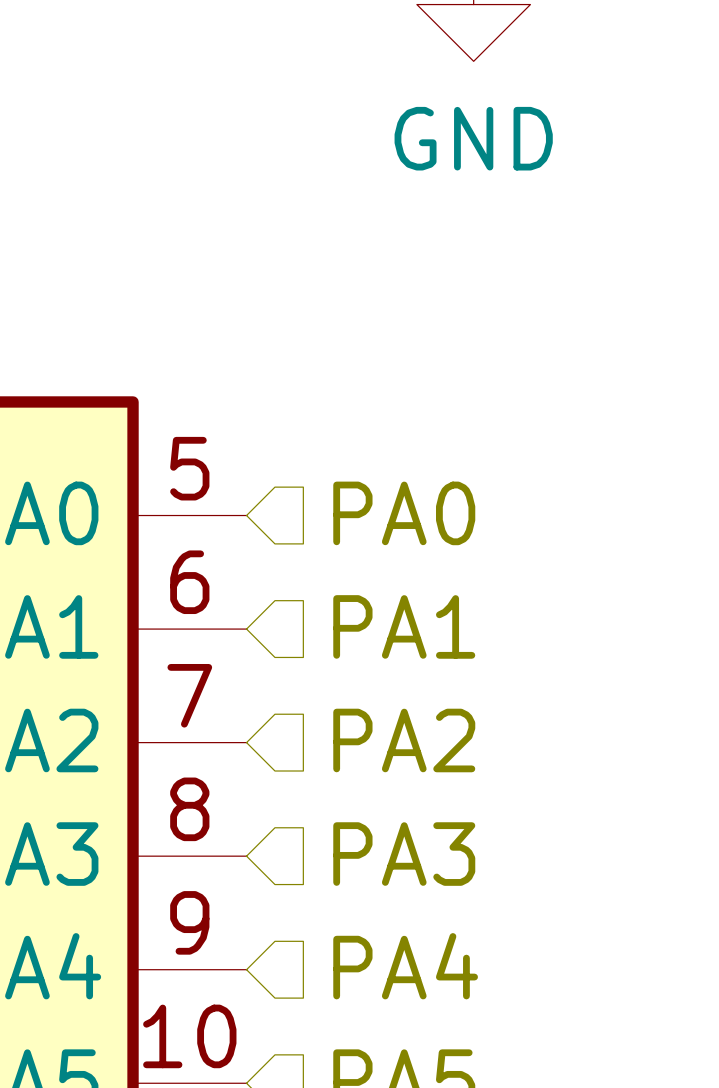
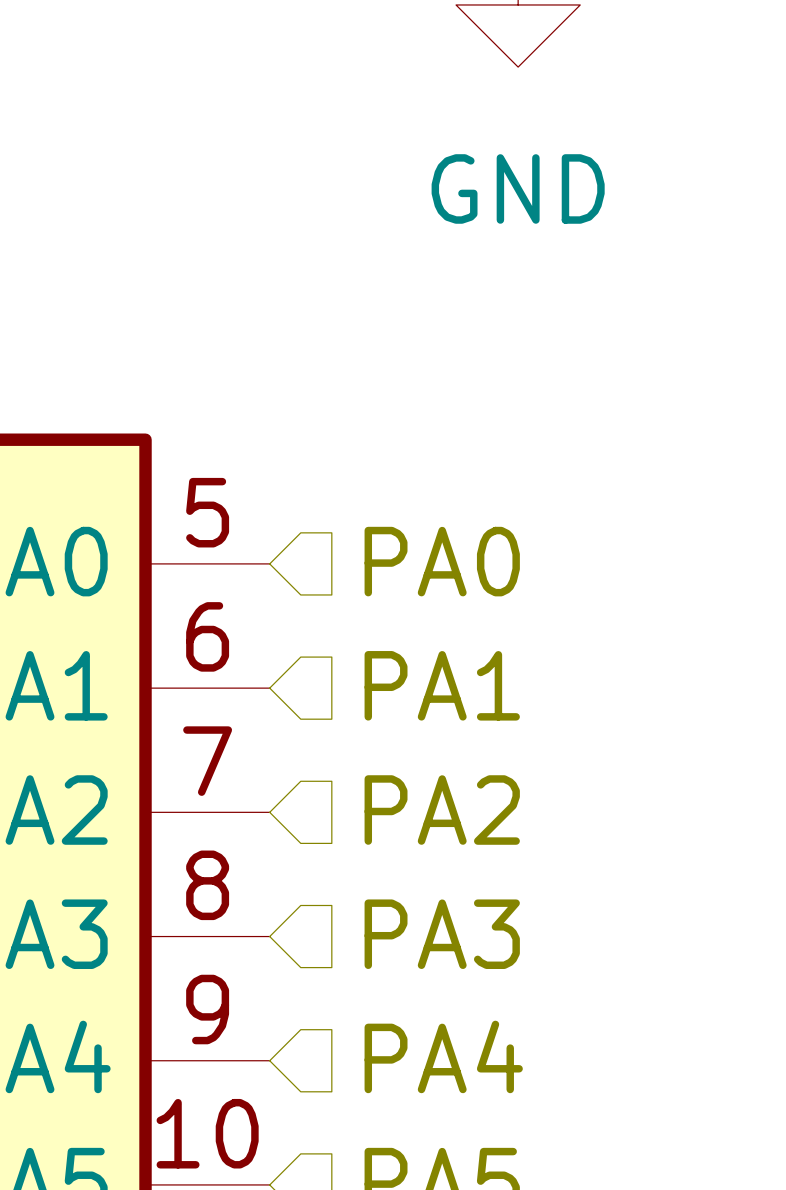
power symbol text position: GND (473, 138) -> GND (518, 188)

